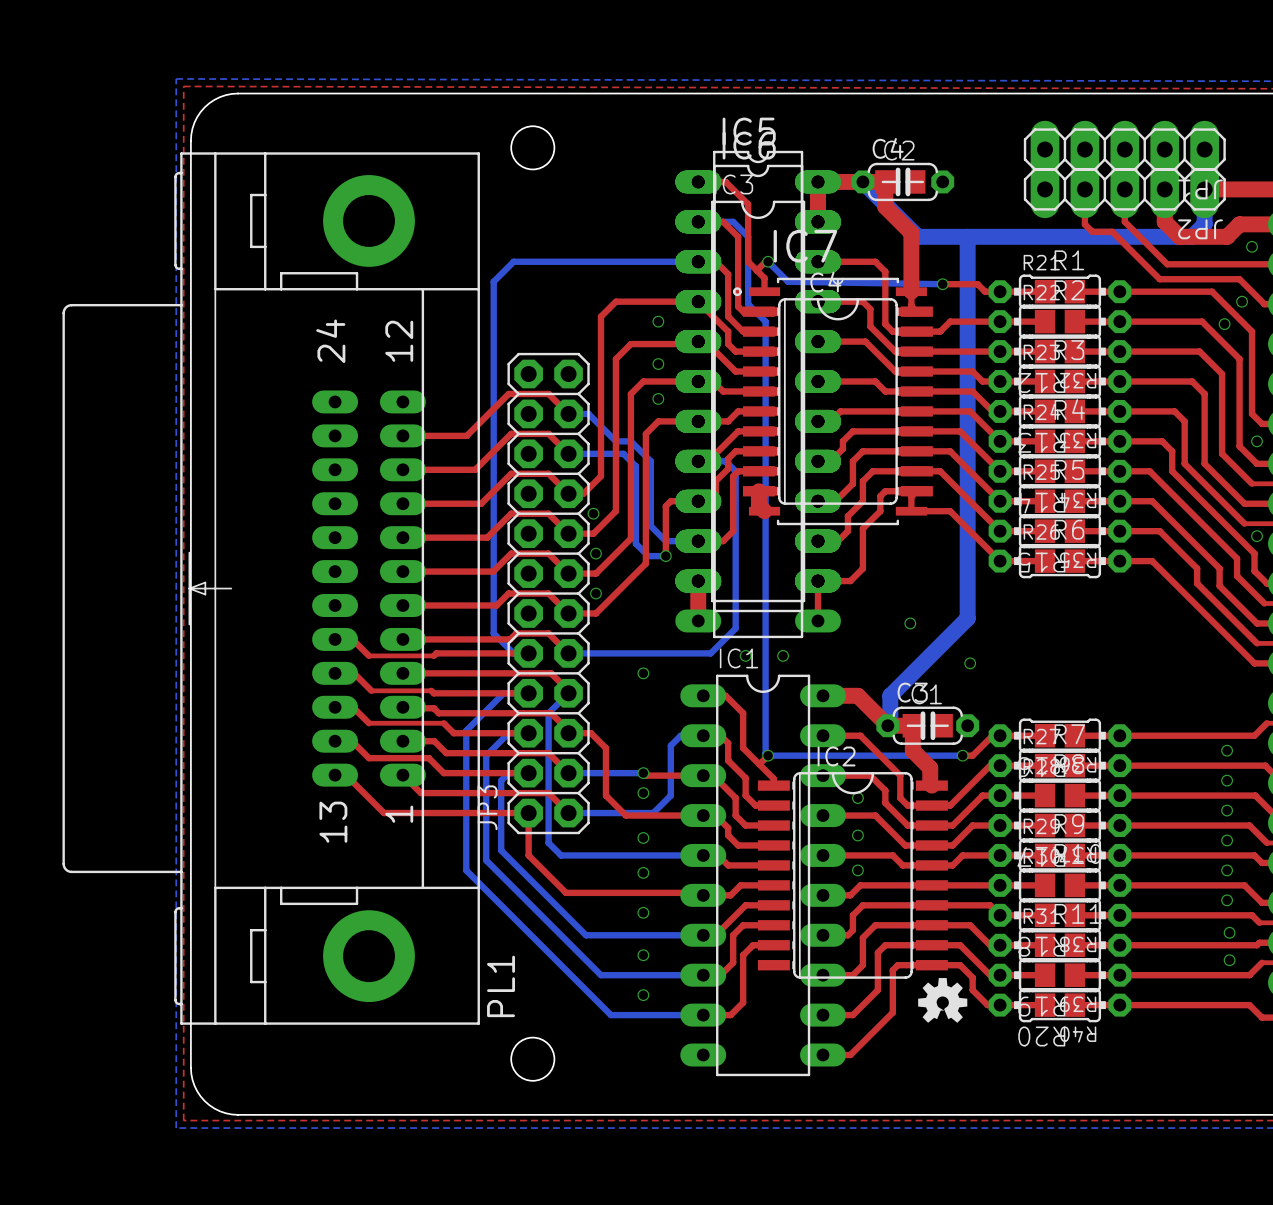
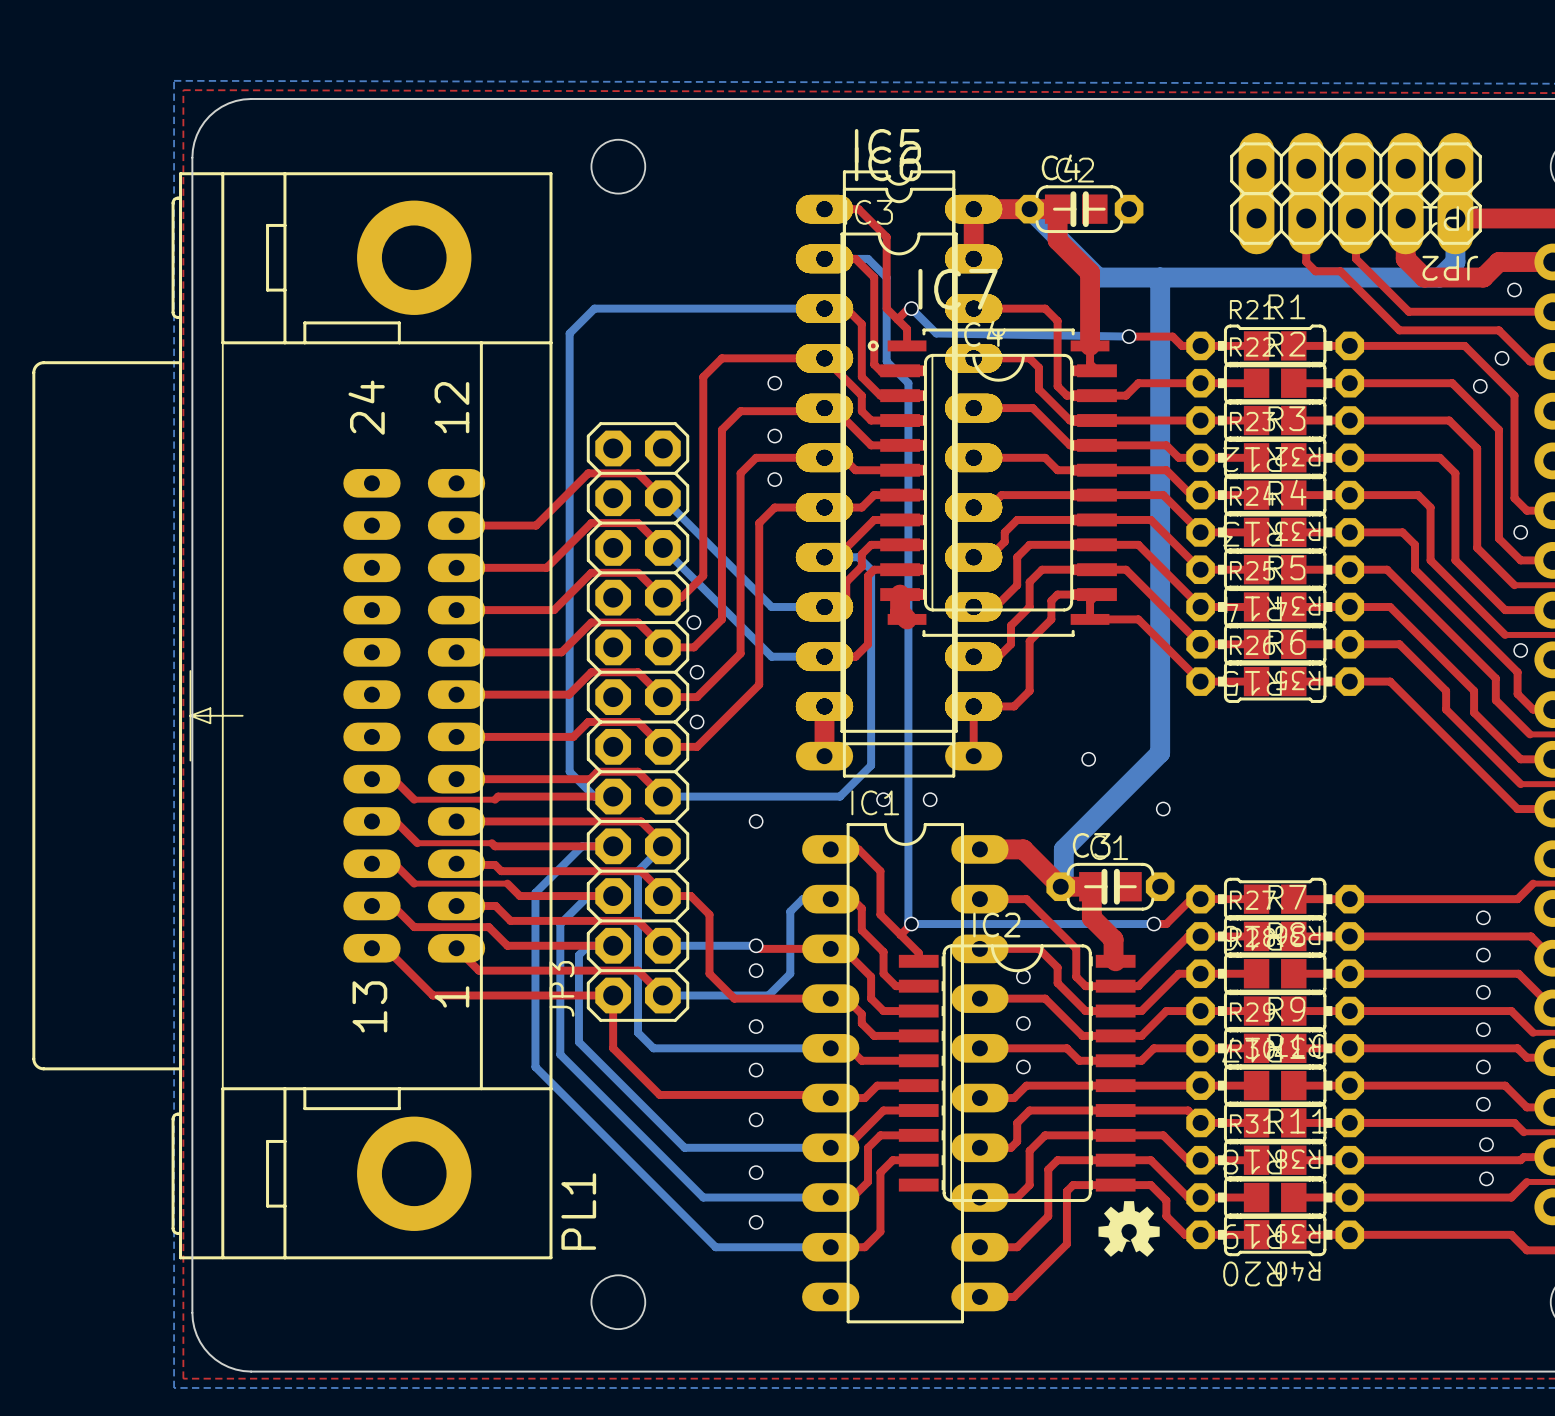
bottom track: (568, 413) (588, 413) (615, 441) (630, 441) (650, 461) (650, 526) (665, 541) -> (662, 498) (771, 606) (824, 606)
bottom track: (568, 453) (623, 453) (635, 466) (635, 543) (648, 556) (665, 556) -> (662, 547) (771, 656) (784, 656)
top track: (698, 501) (670, 501) (665, 506) (665, 556) -> none
via: (665, 556) -> none

